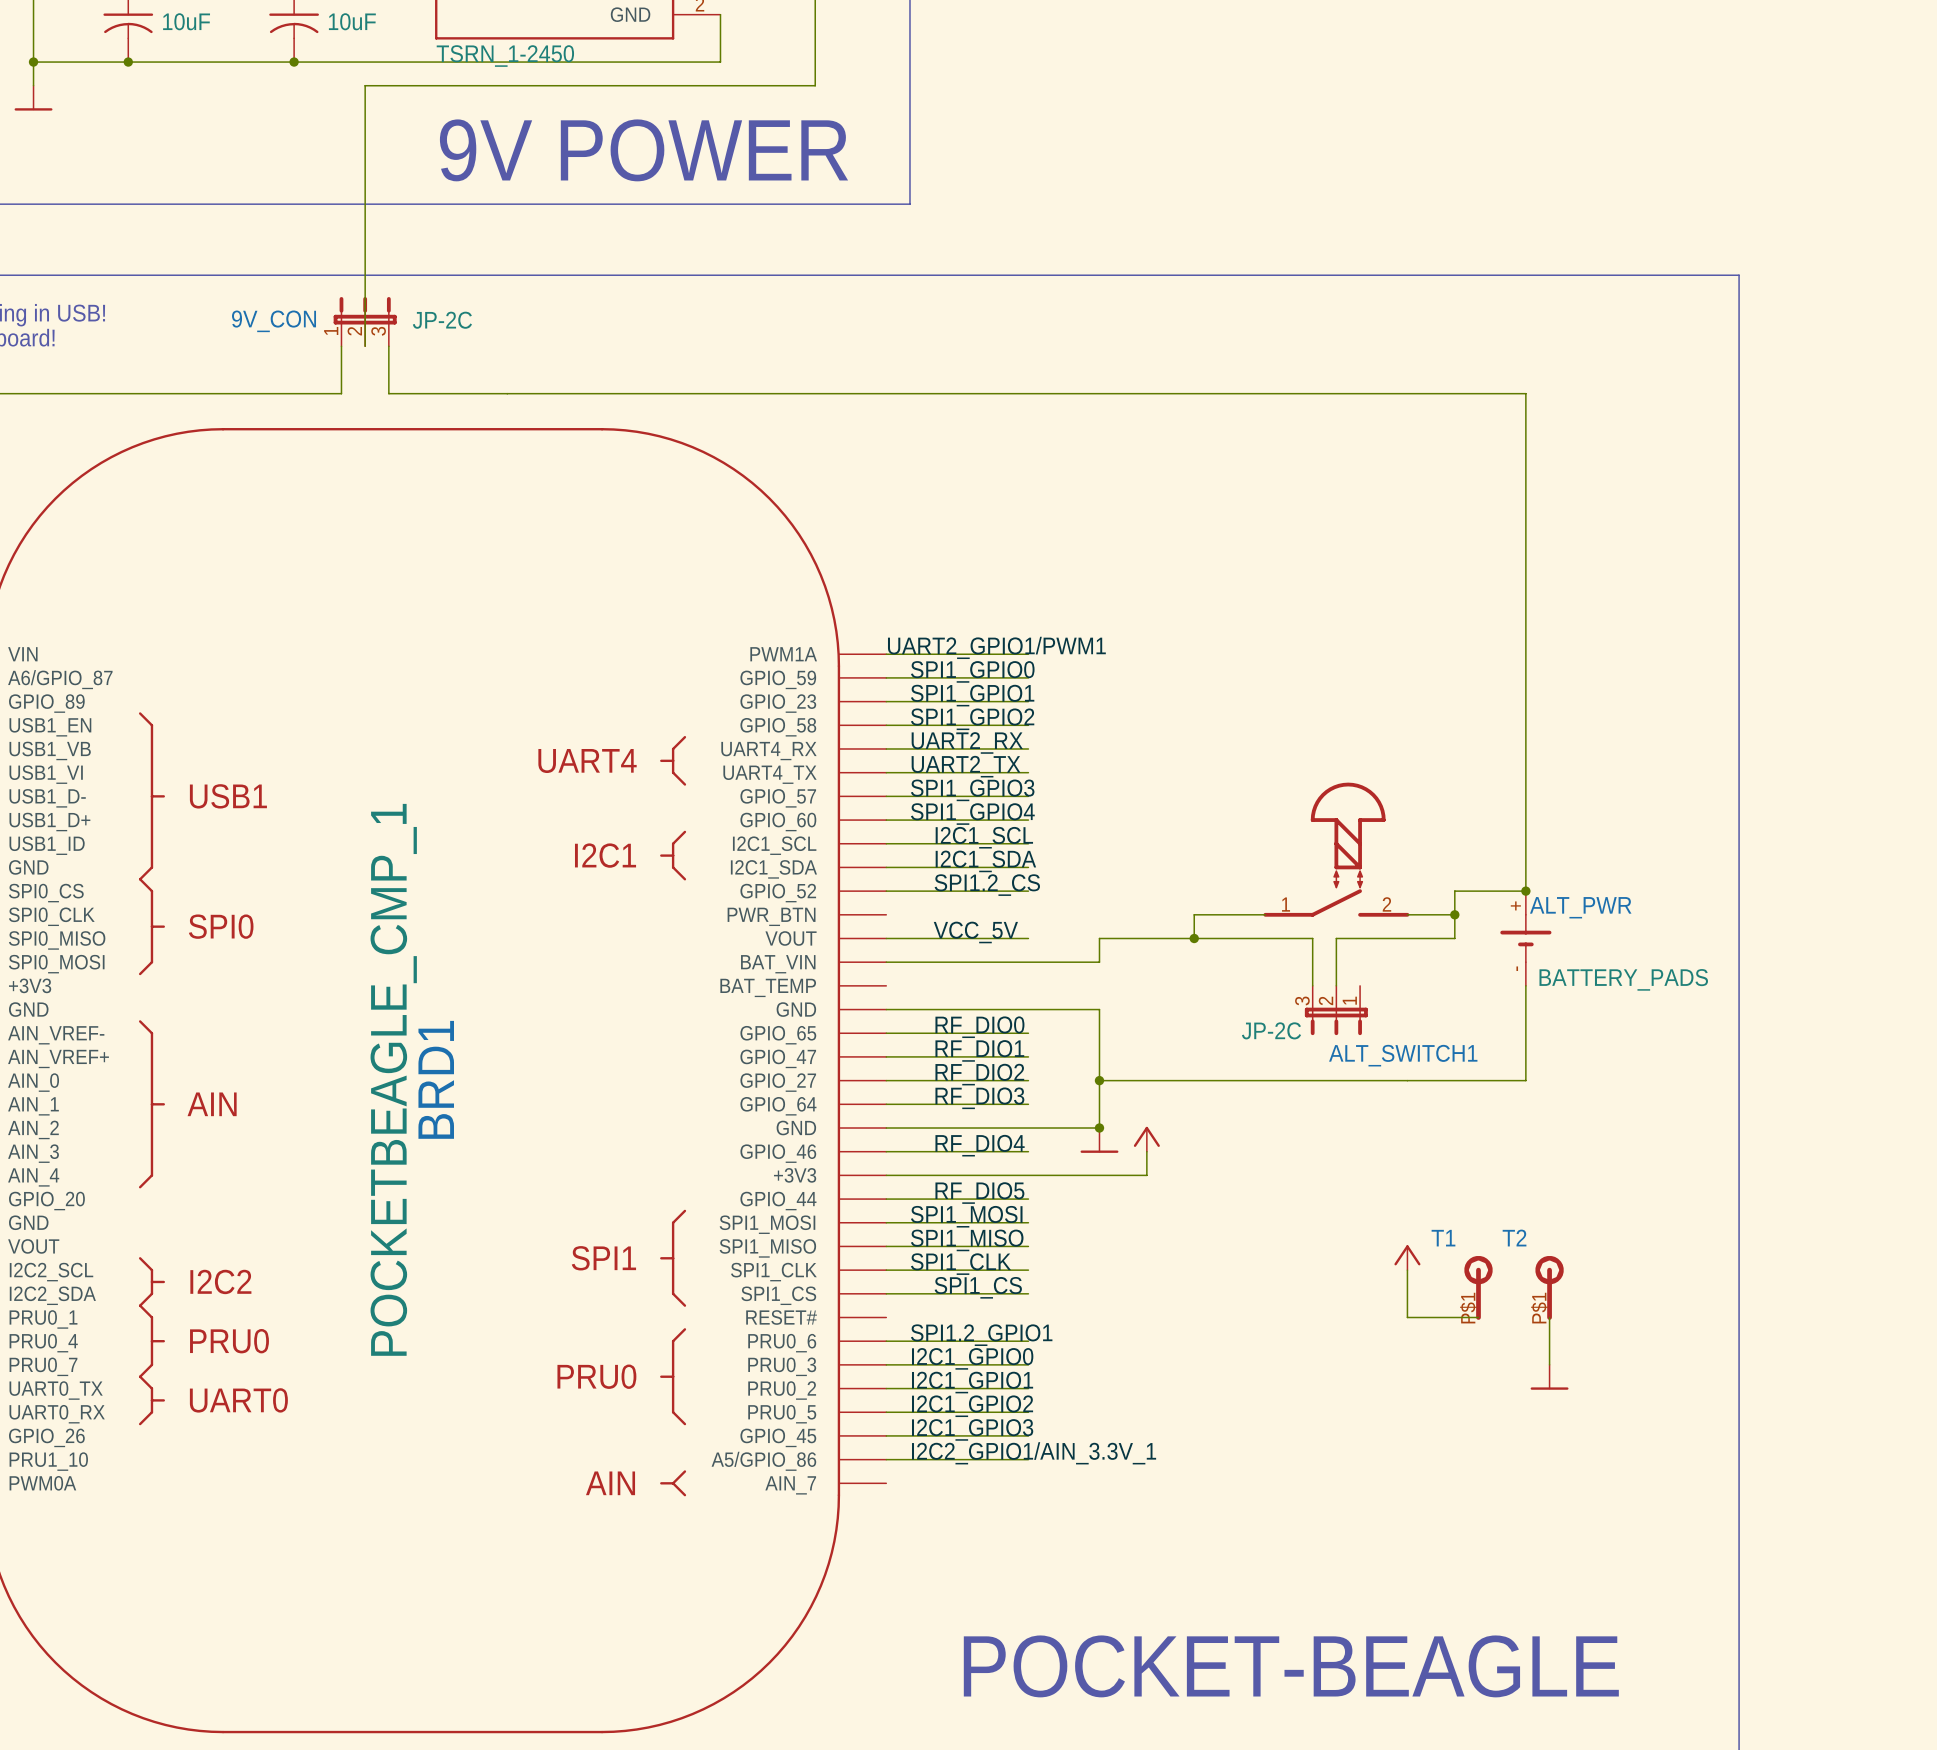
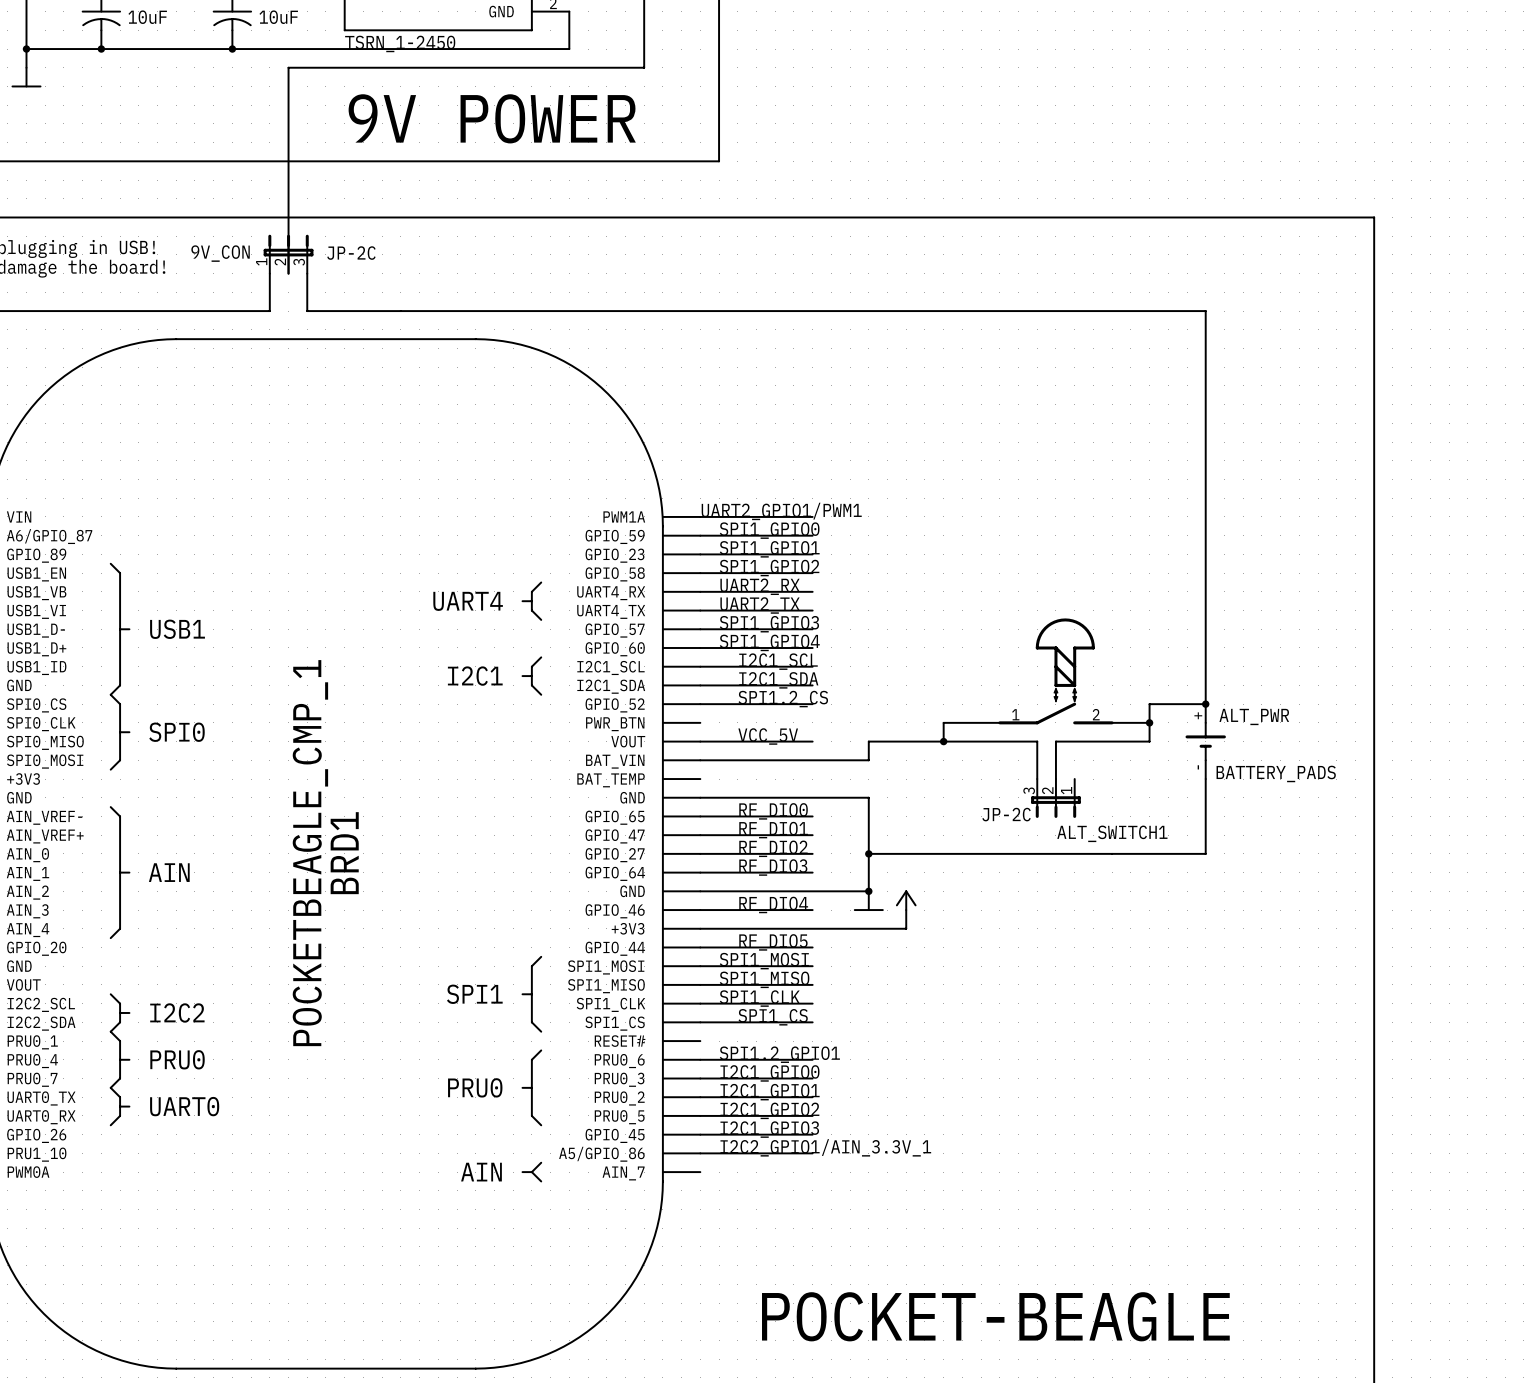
power symbol: (1407, 1257) -> none
wire: (1407, 1270) (1407, 1317) (1478, 1317) -> none
T1: (1478, 1287) -> none
T2: (1549, 1287) -> none
wire: (1549, 1317) (1549, 1364) -> none
power symbol: (1549, 1377) -> none

